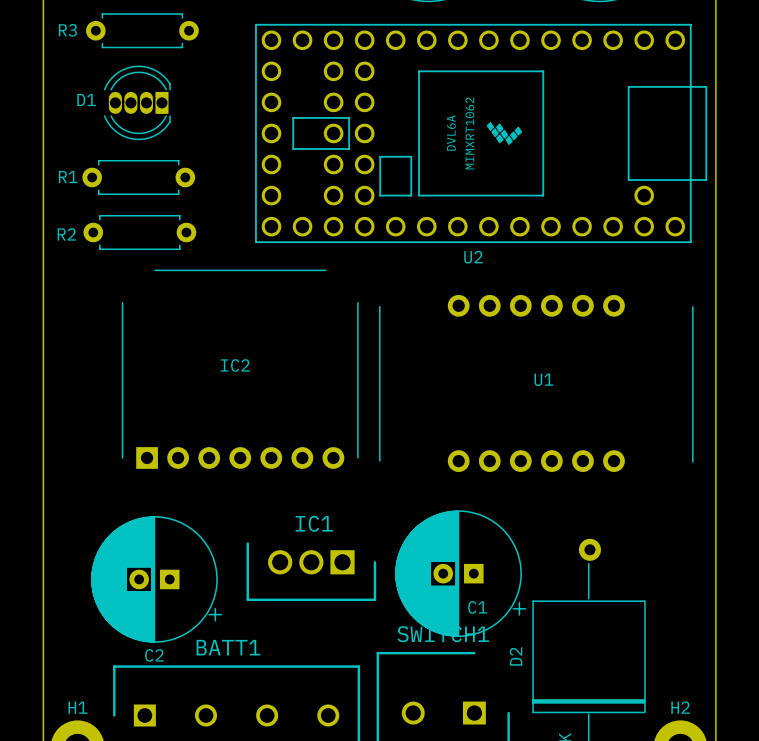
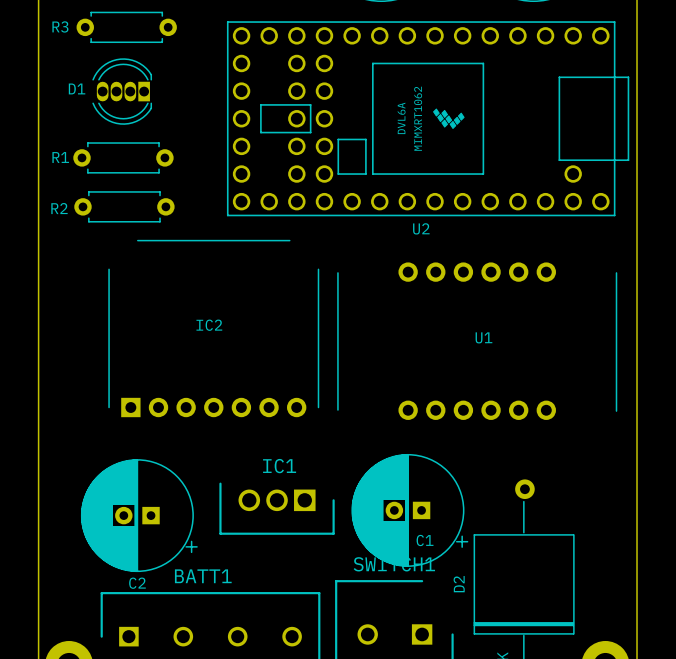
H1 name: H1 (77, 707) -> none
H2 name: H2 (680, 707) -> none

